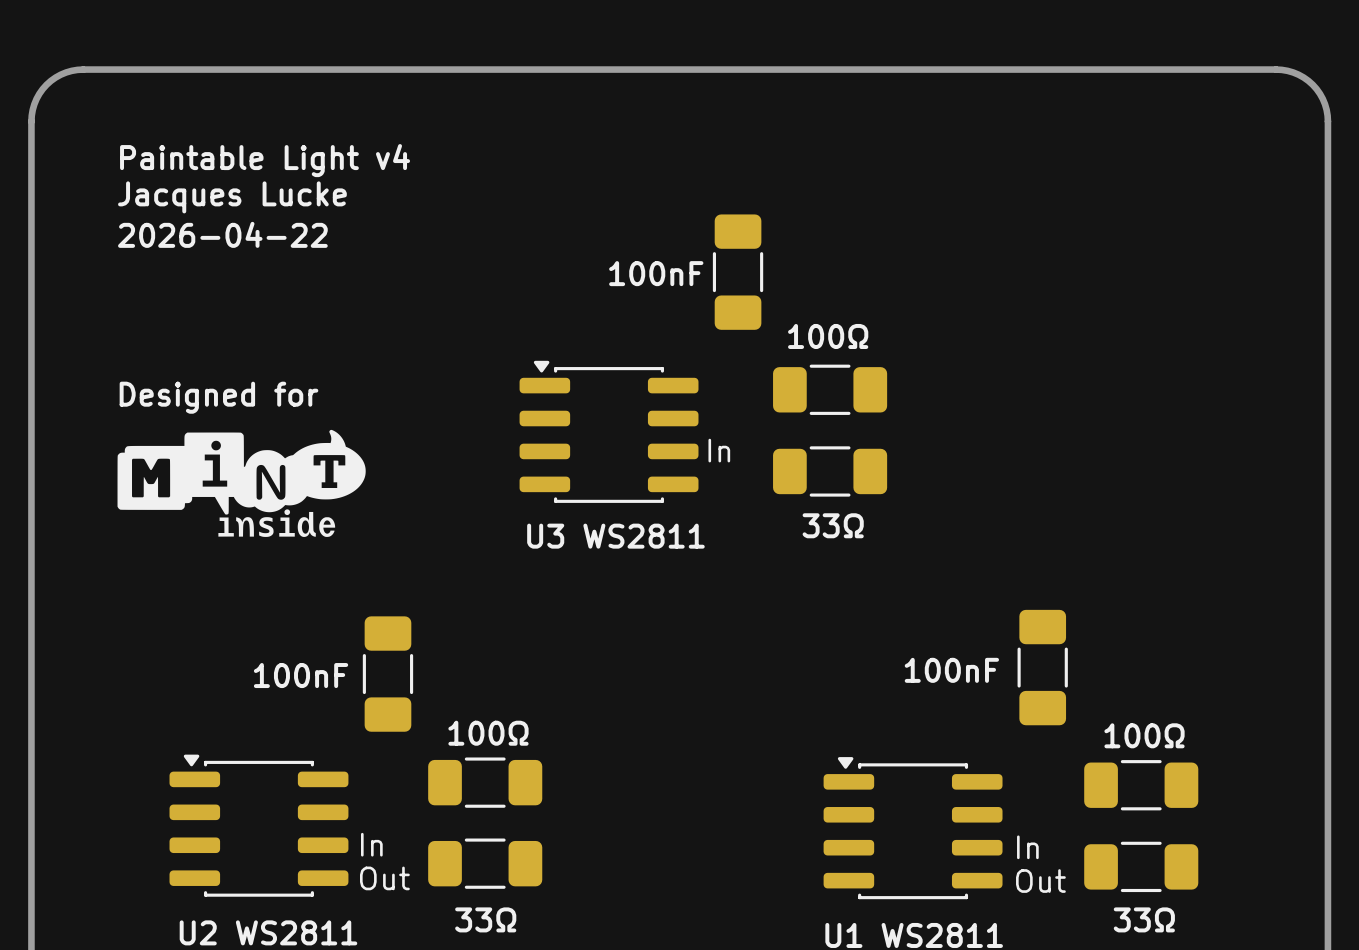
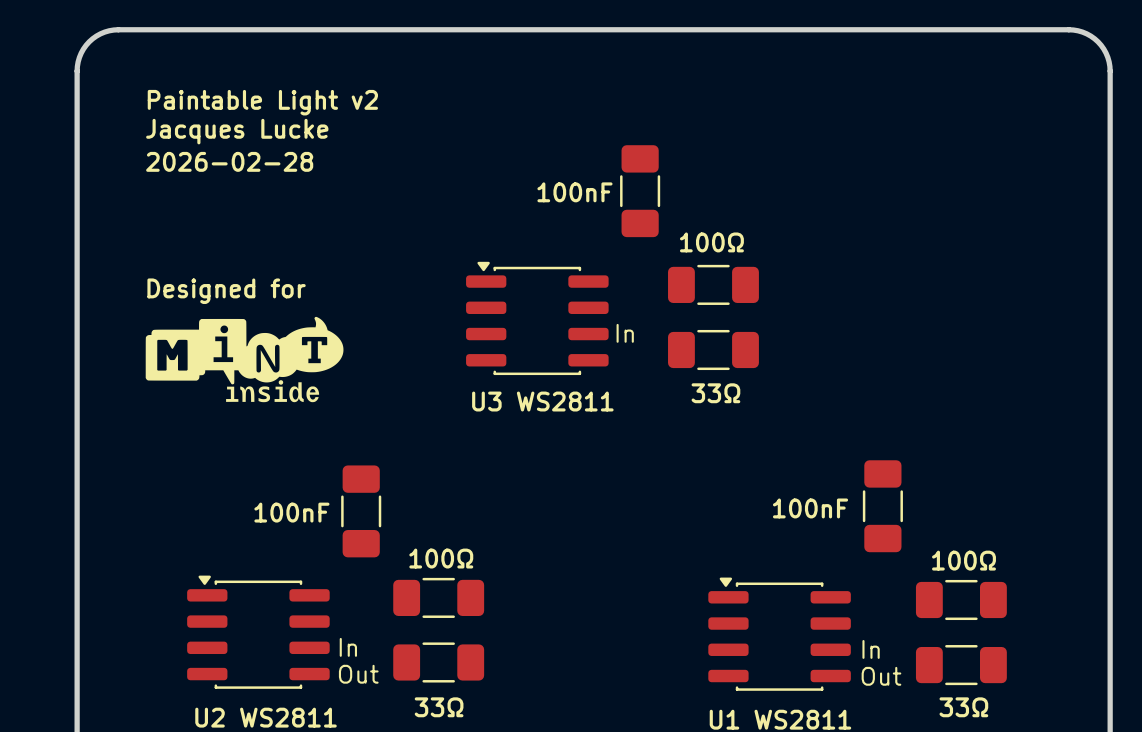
text: Paintable Light v4 (265, 160) -> Paintable Light v2 (262, 102)
text: 2026-04-22 (222, 234) -> 2026-02-28 (229, 161)

